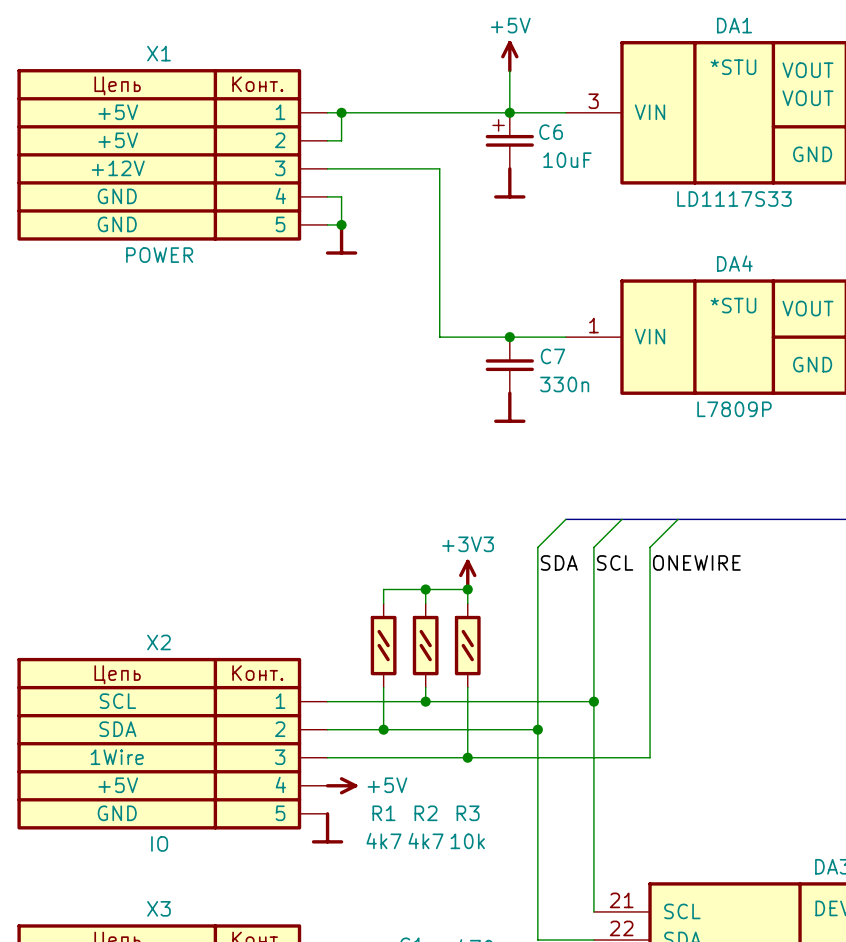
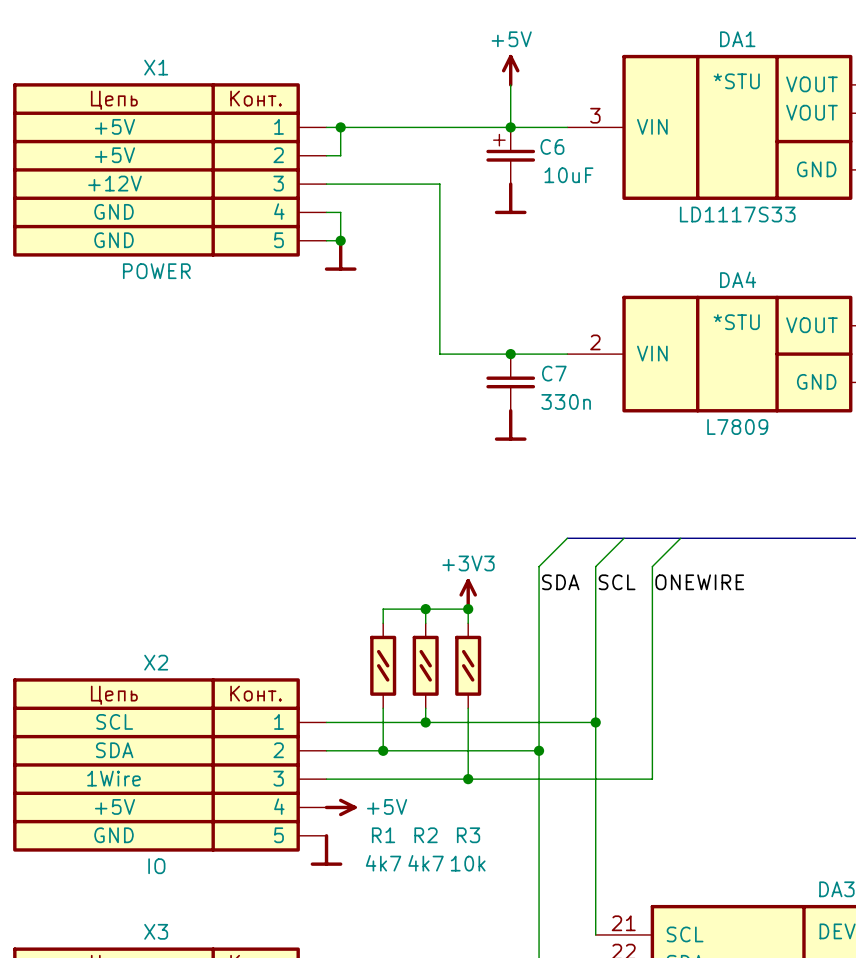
DA4 pin number: 1 (593, 325) -> 2 (595, 342)
DA4 value: L7809P (734, 409) -> L7809 (737, 427)

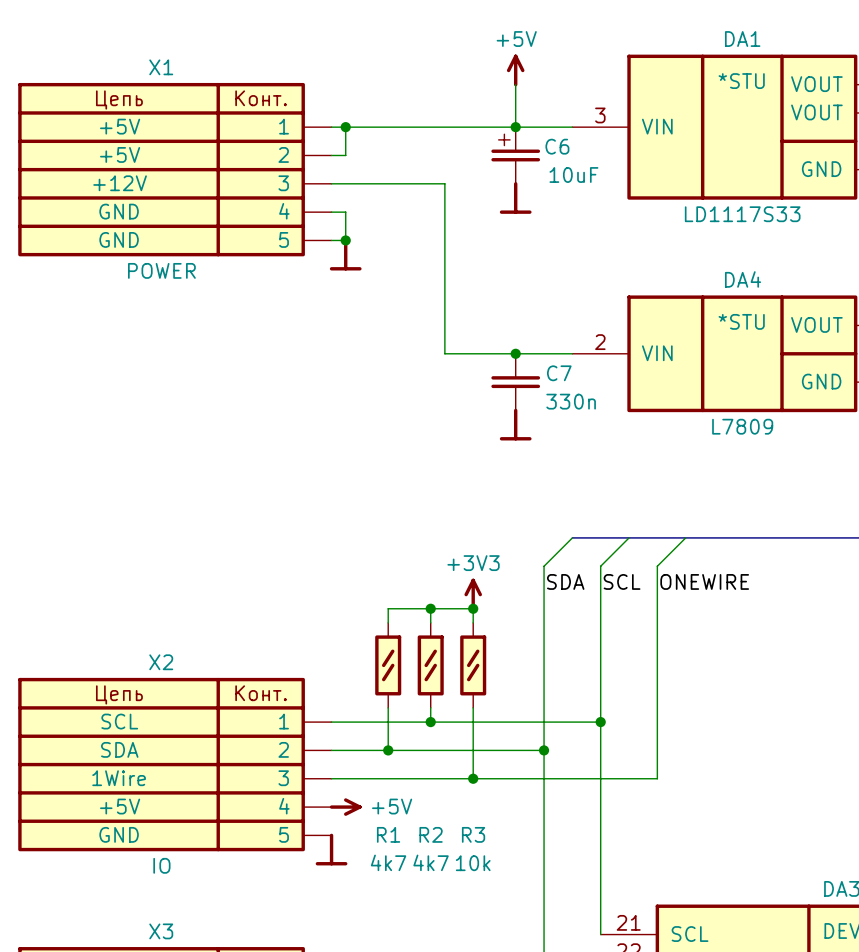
R1 flip: as is (383, 665) -> left-right (388, 665)
R2 flip: as is (425, 665) -> left-right (430, 665)
R3 flip: as is (468, 665) -> left-right (473, 665)

